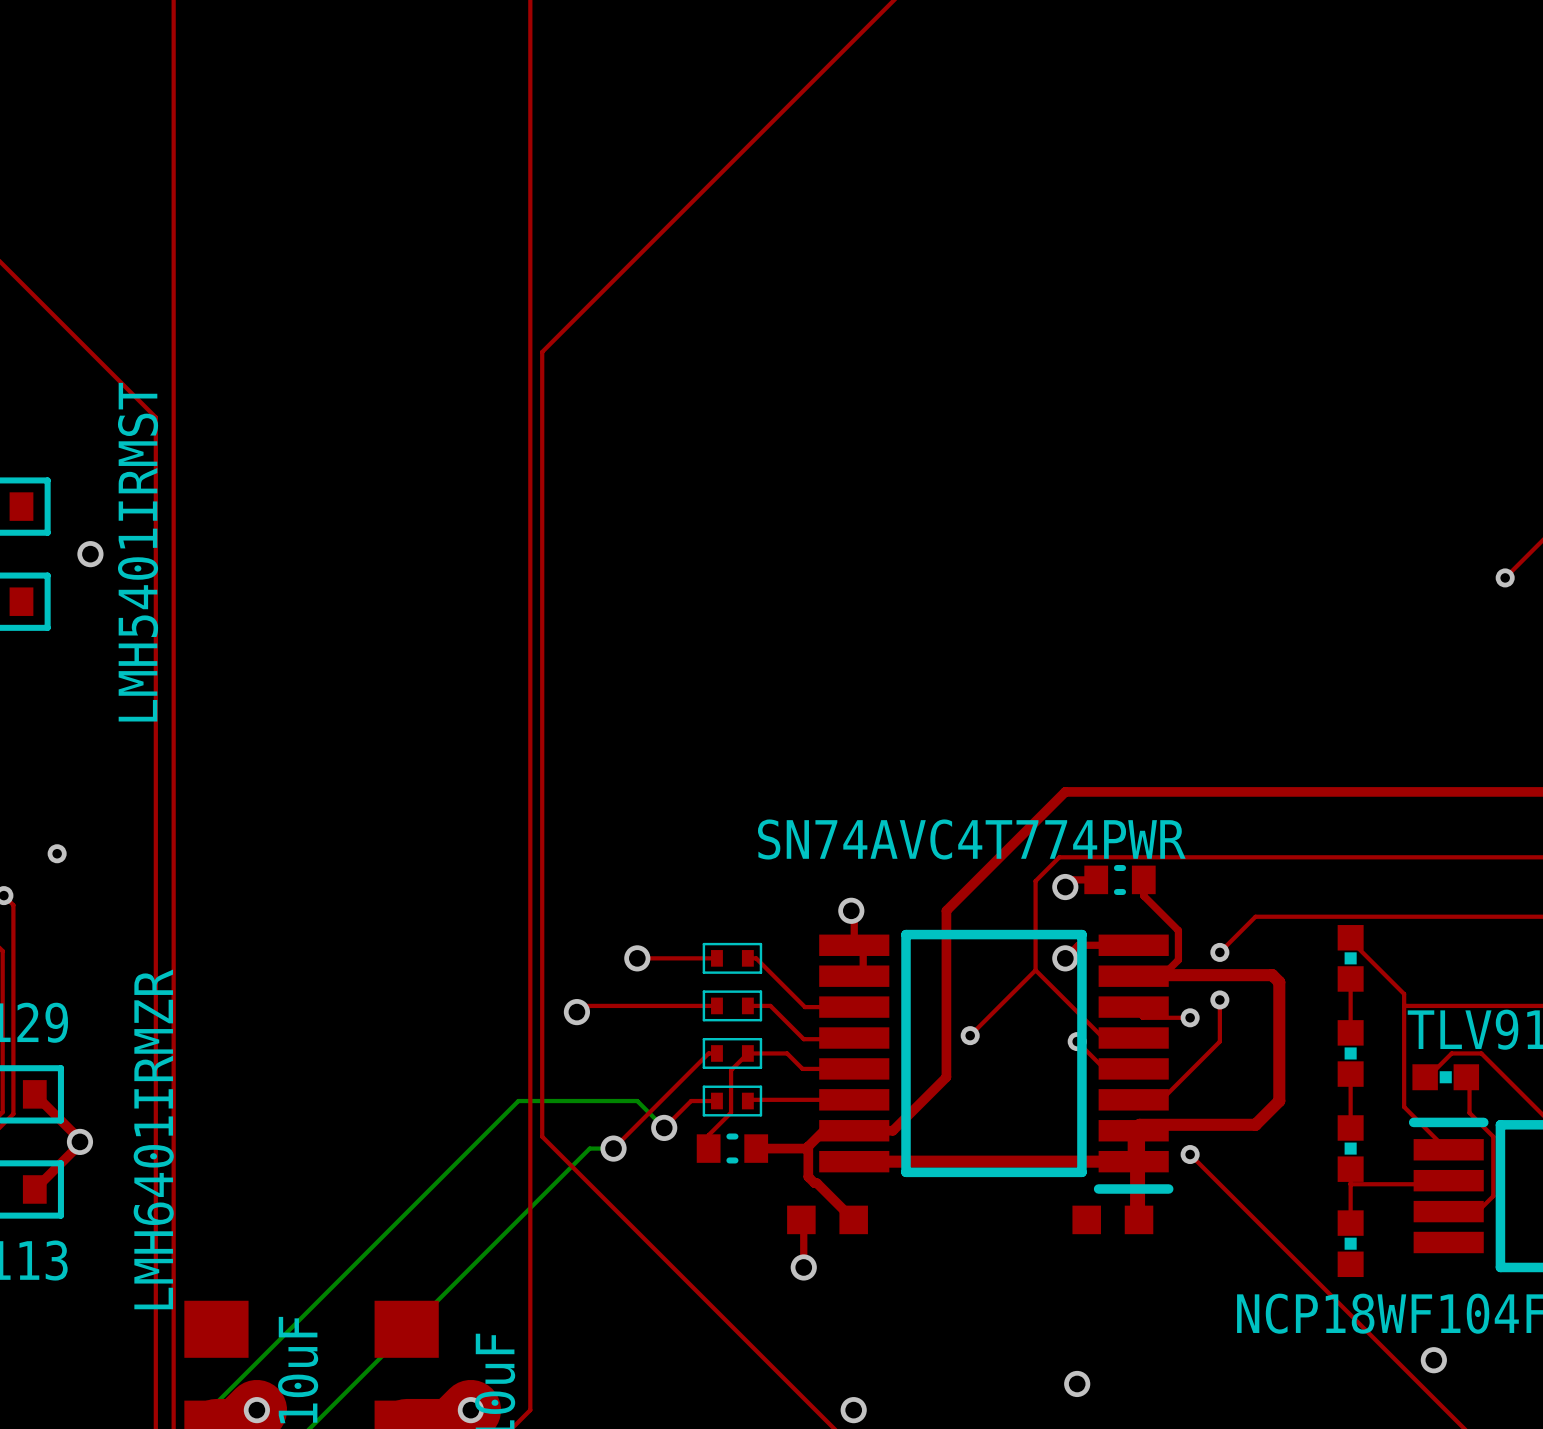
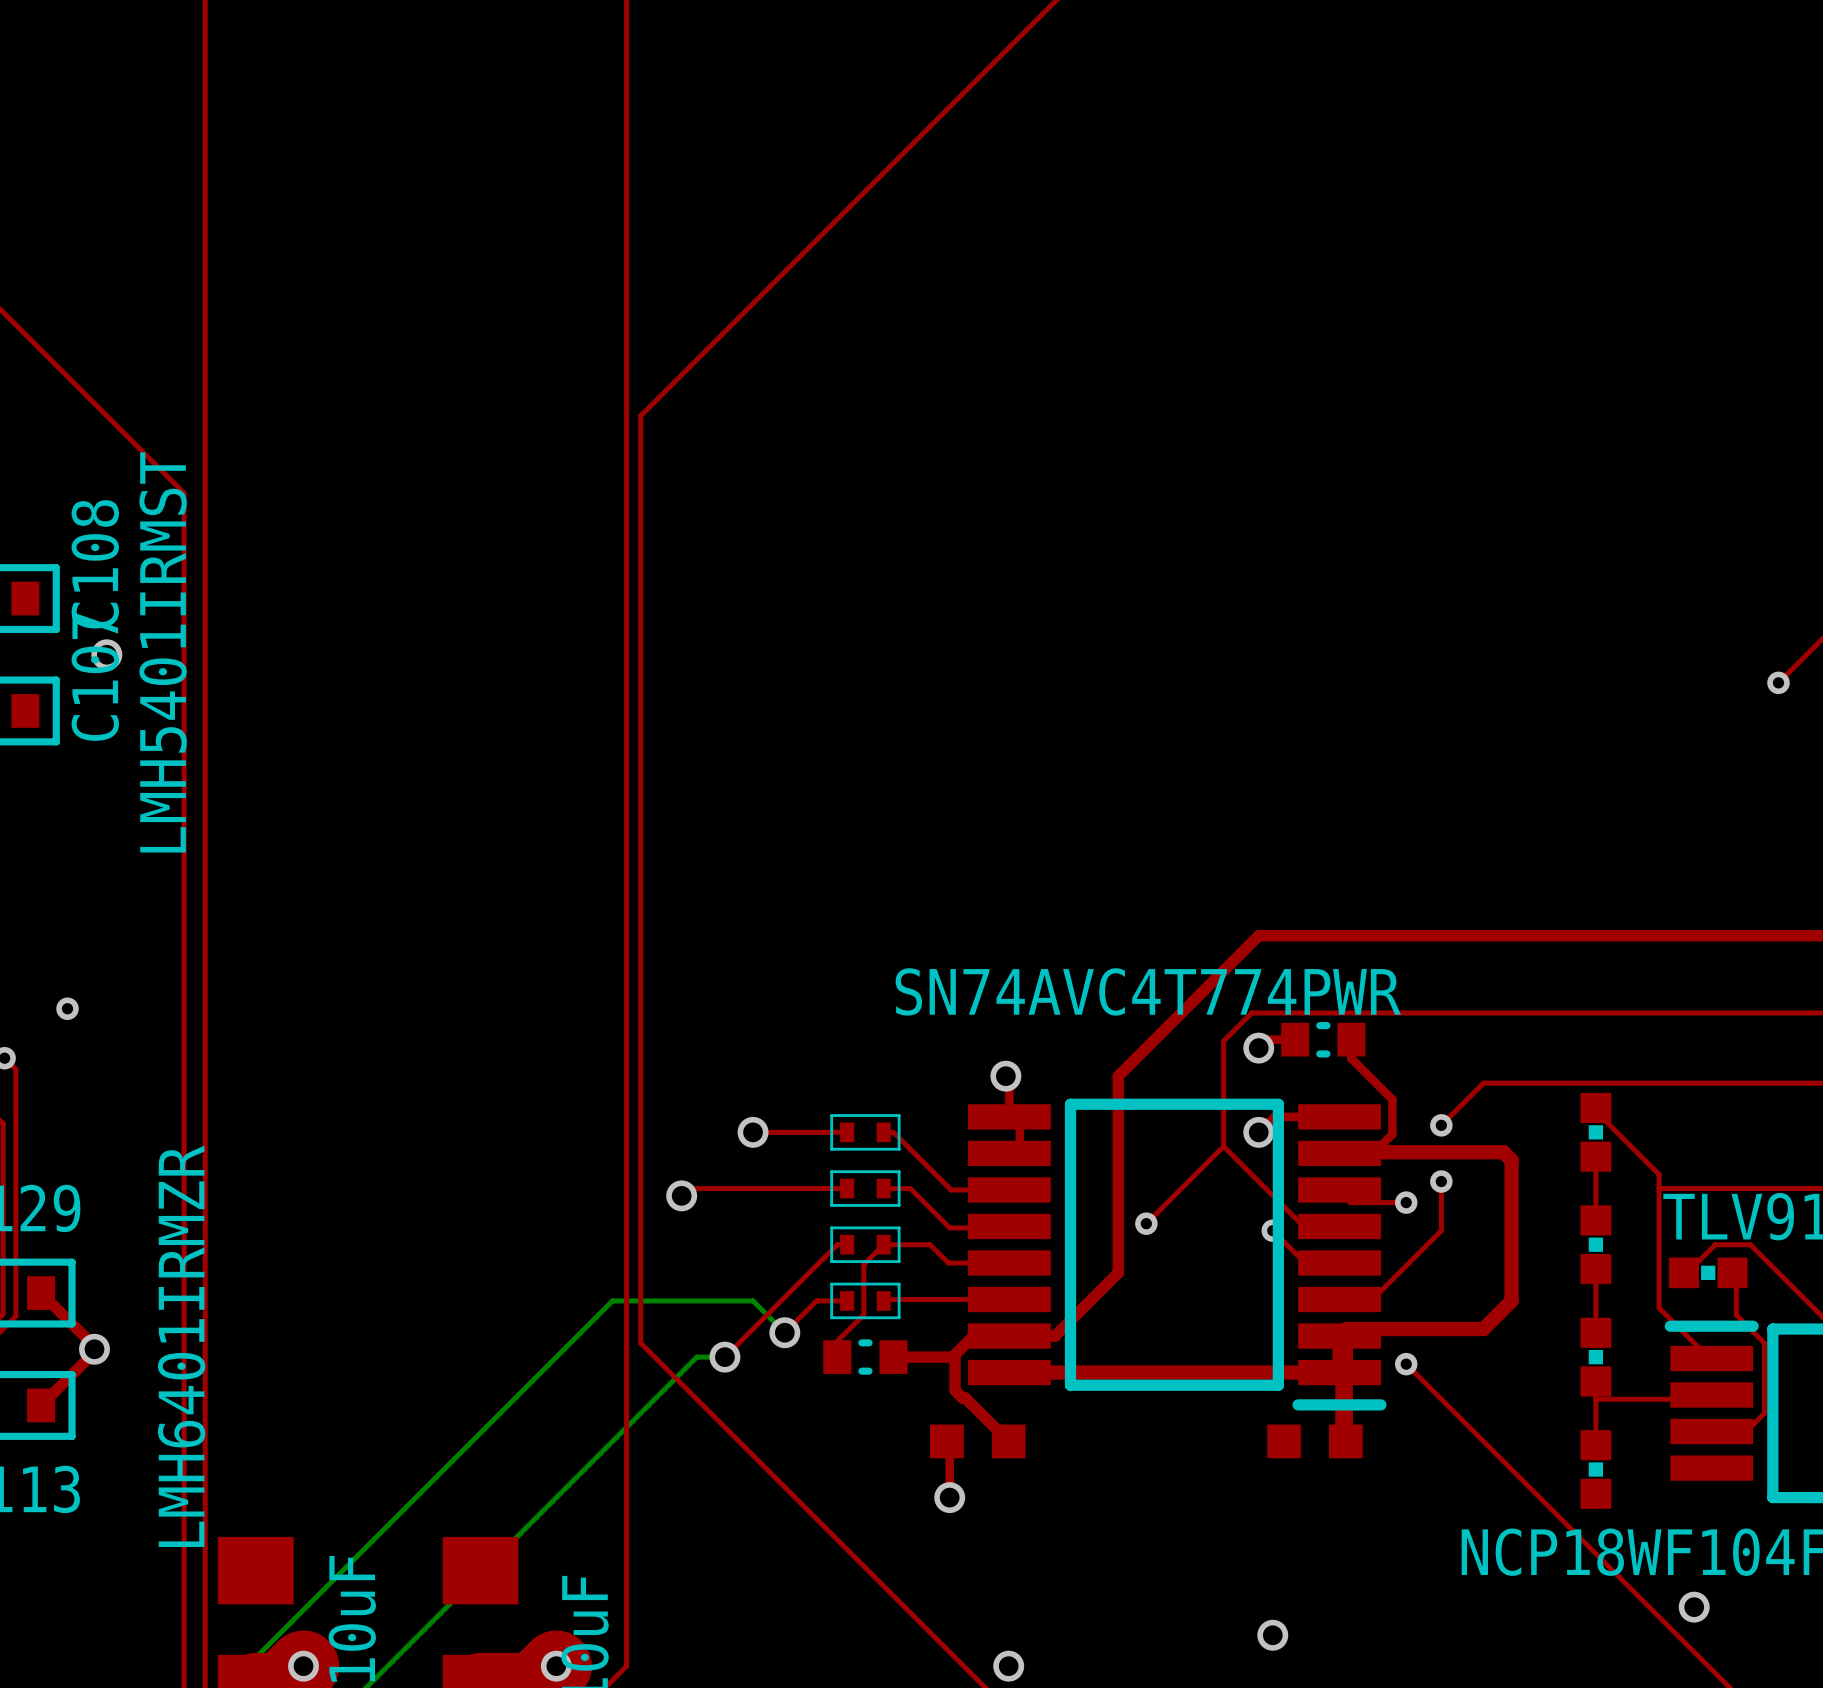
C108 name: none -> C108 (95, 564)
C107 name: none -> C107 (95, 676)

